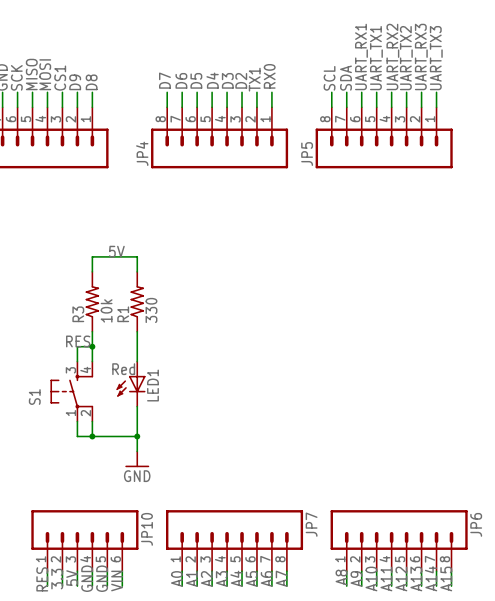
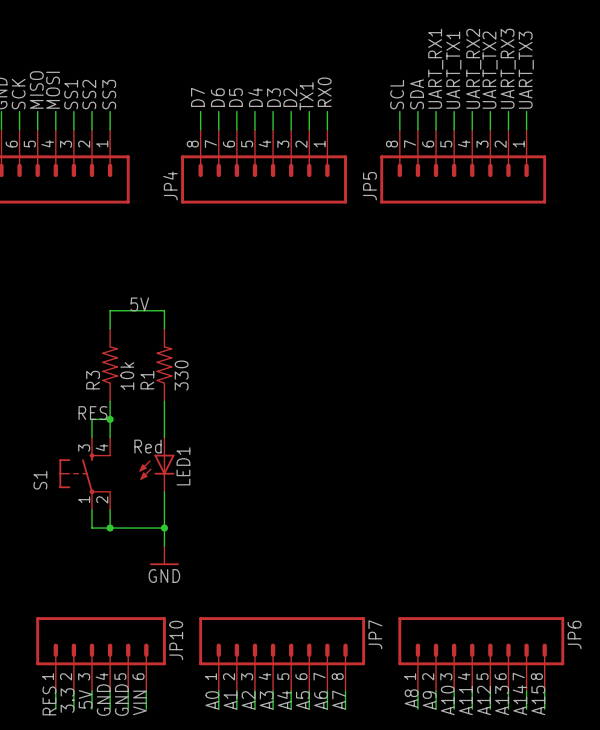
label: CS1 (60, 78) -> SS1 (71, 94)
label: D9 (75, 82) -> SS2 (89, 94)
label: D8 (91, 82) -> SS3 (109, 94)

